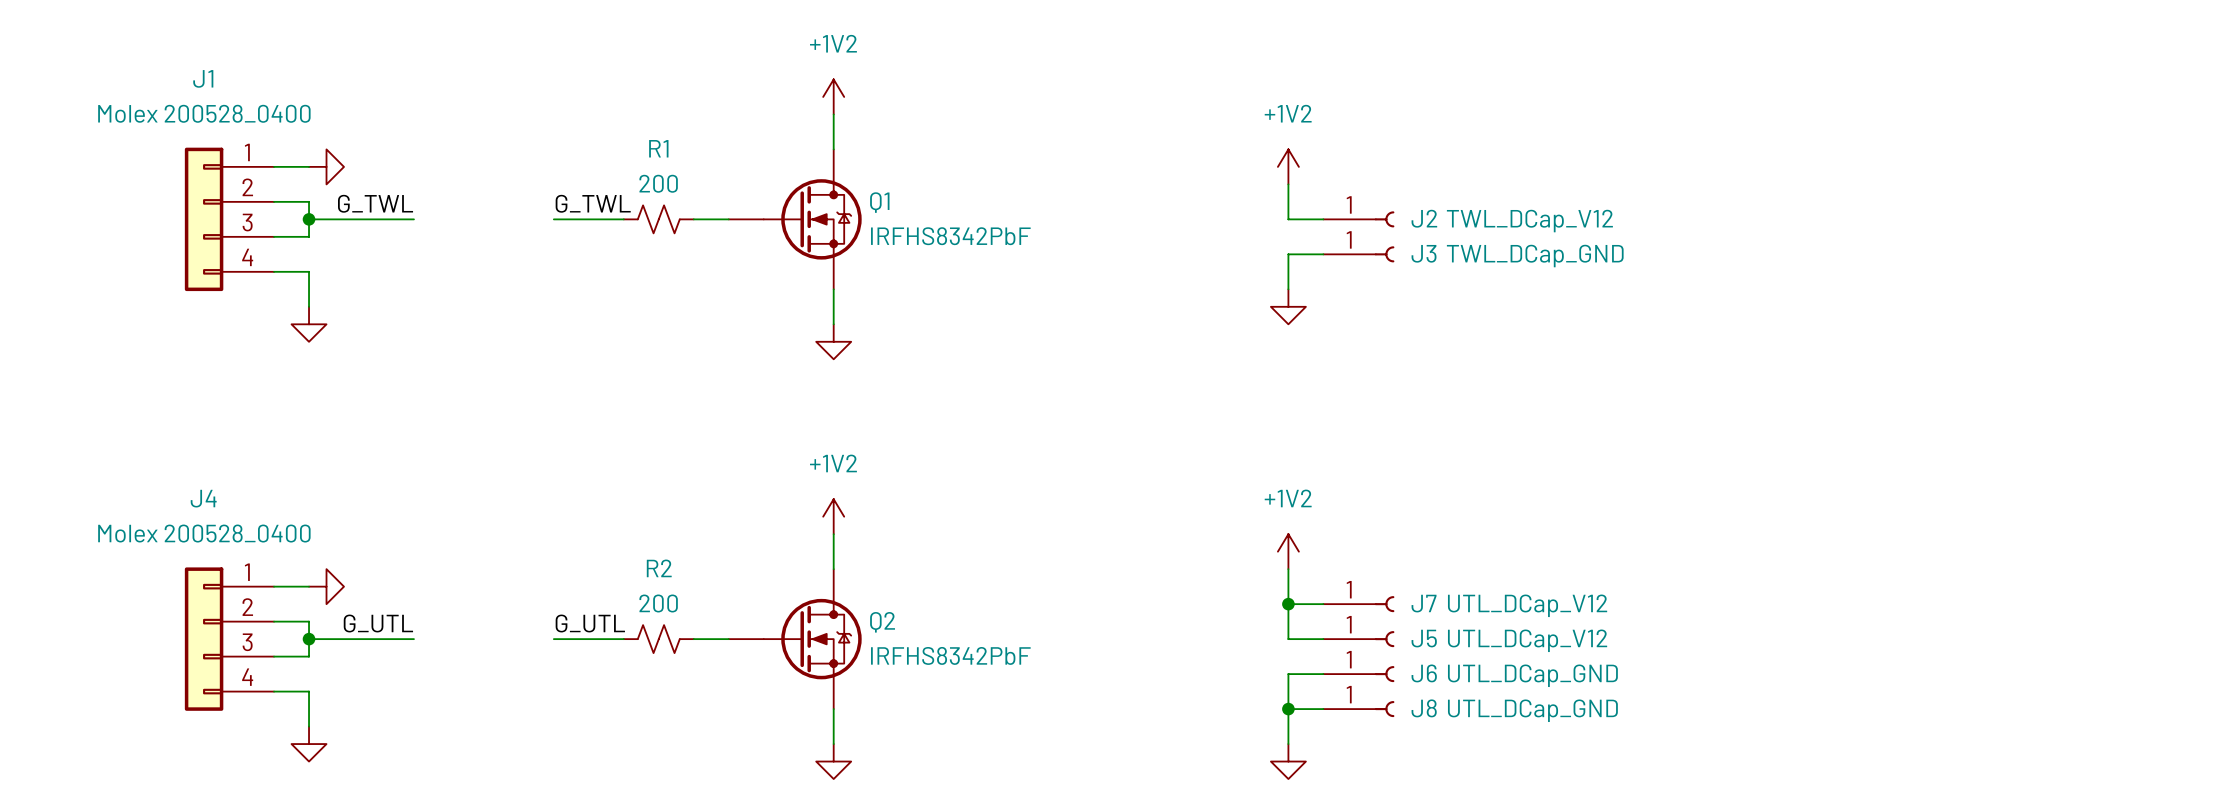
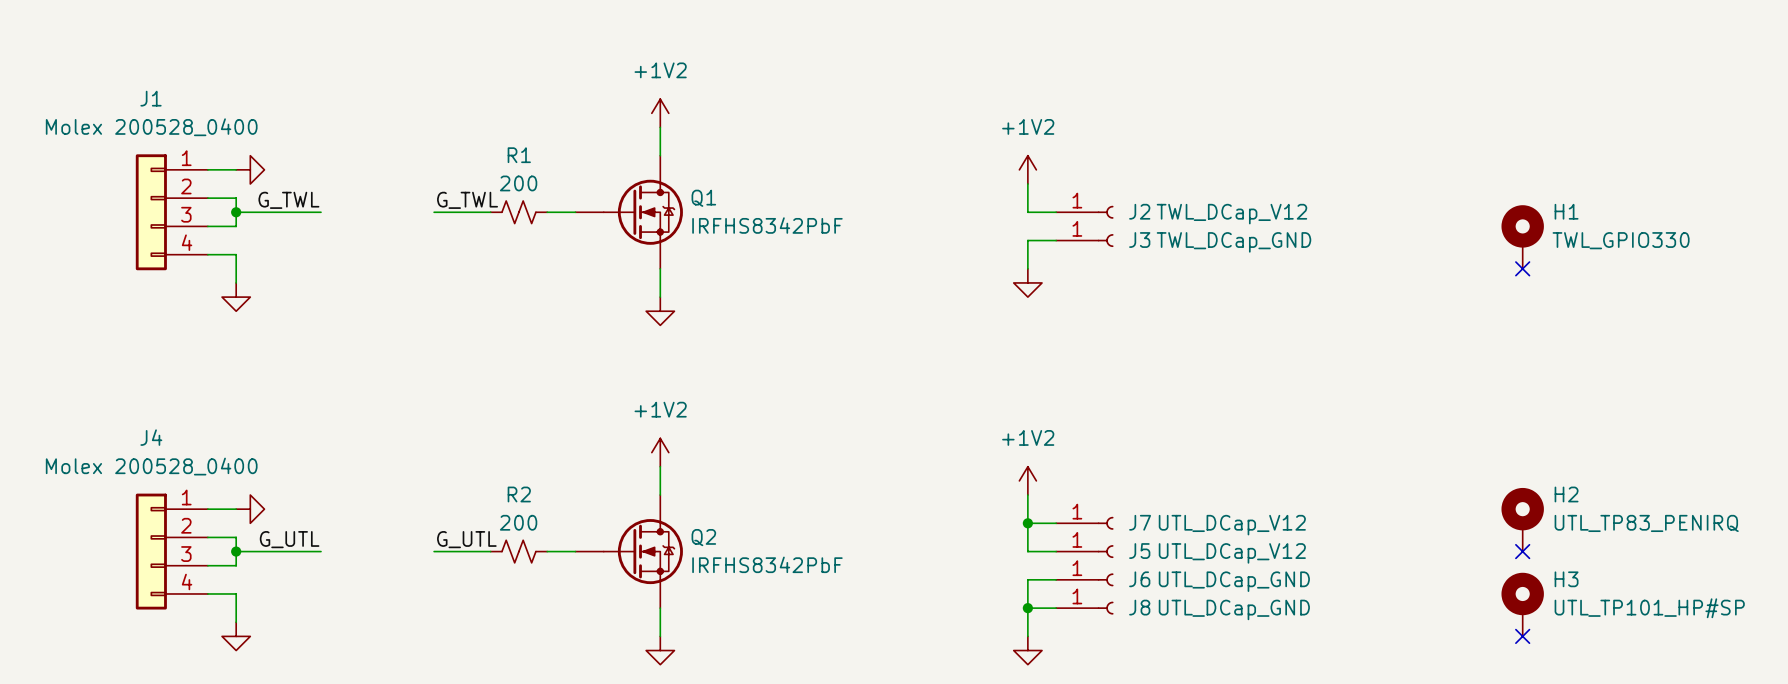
H1: none -> TWL_GPIO330 (1522, 237)
no-connect mark: none -> (1522, 268)
H2: none -> UTL_TP83_PENIRQ (1522, 519)
no-connect mark: none -> (1522, 551)
H3: none -> UTL_TP101_HP#SP (1522, 604)
no-connect mark: none -> (1522, 636)

